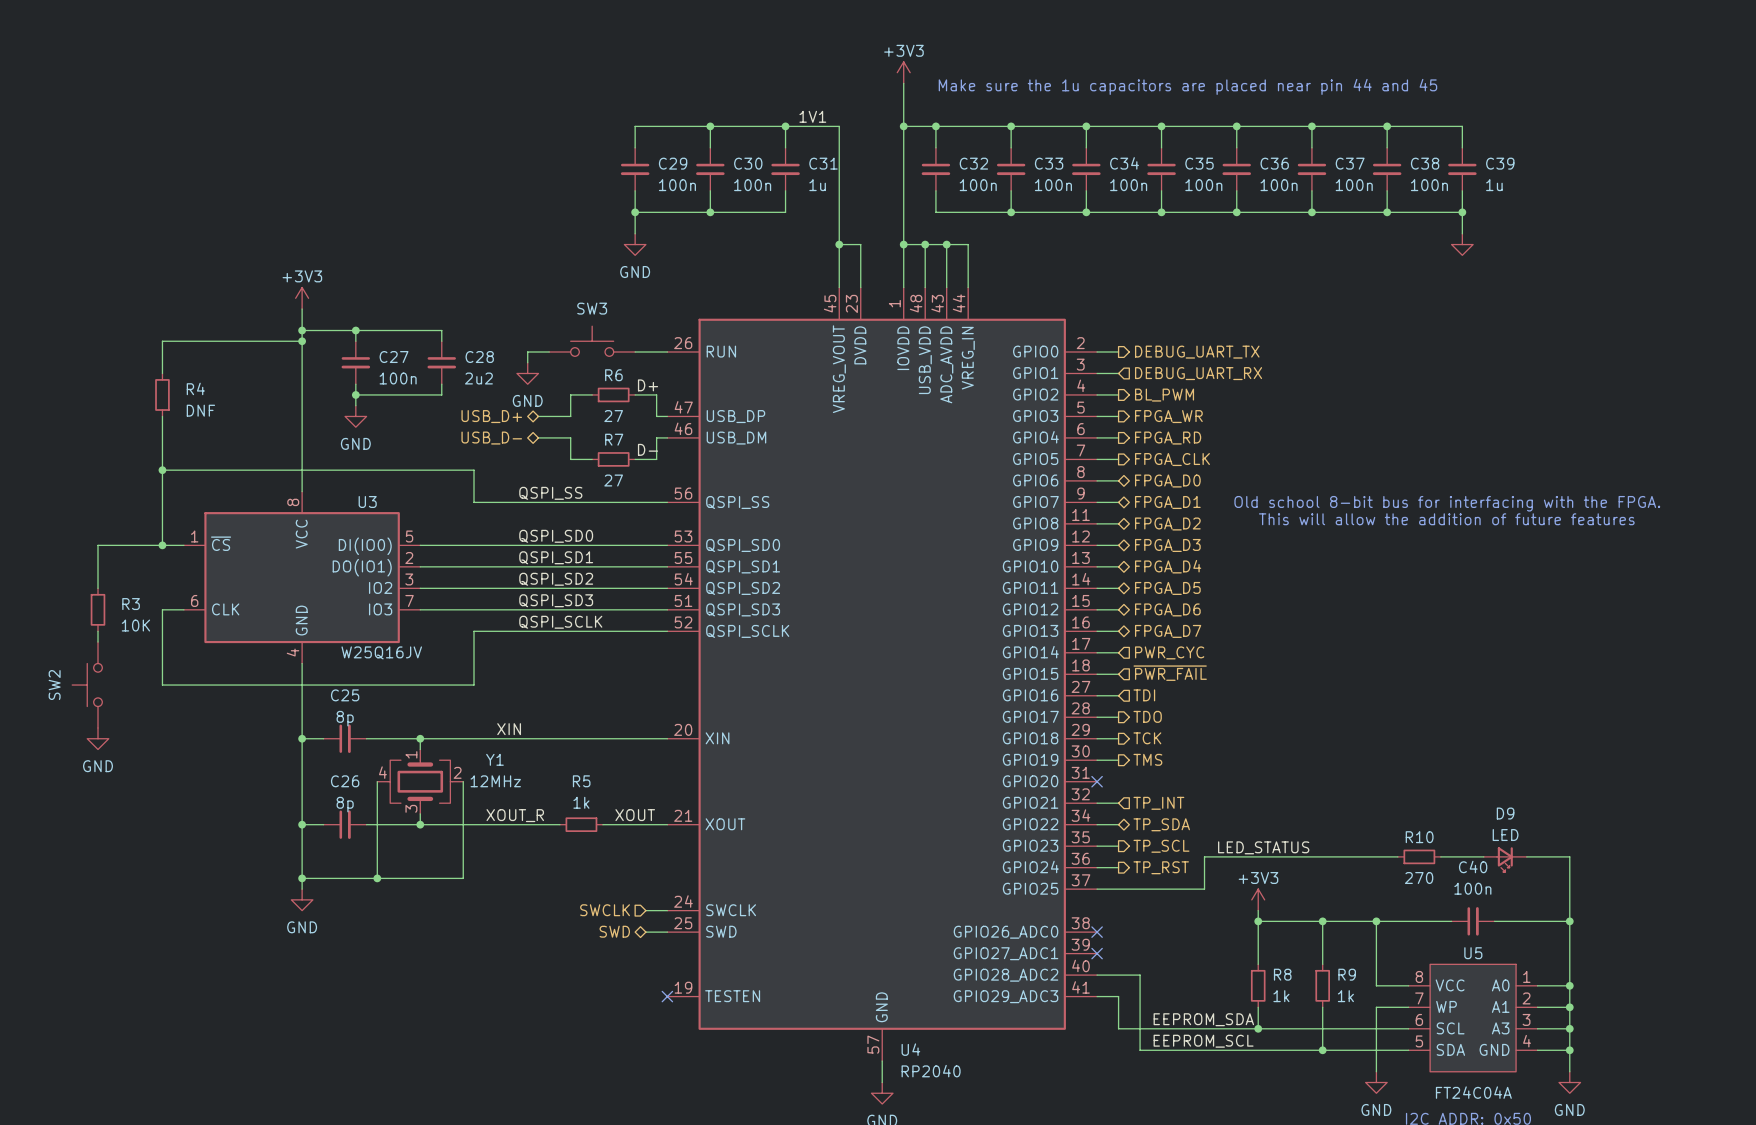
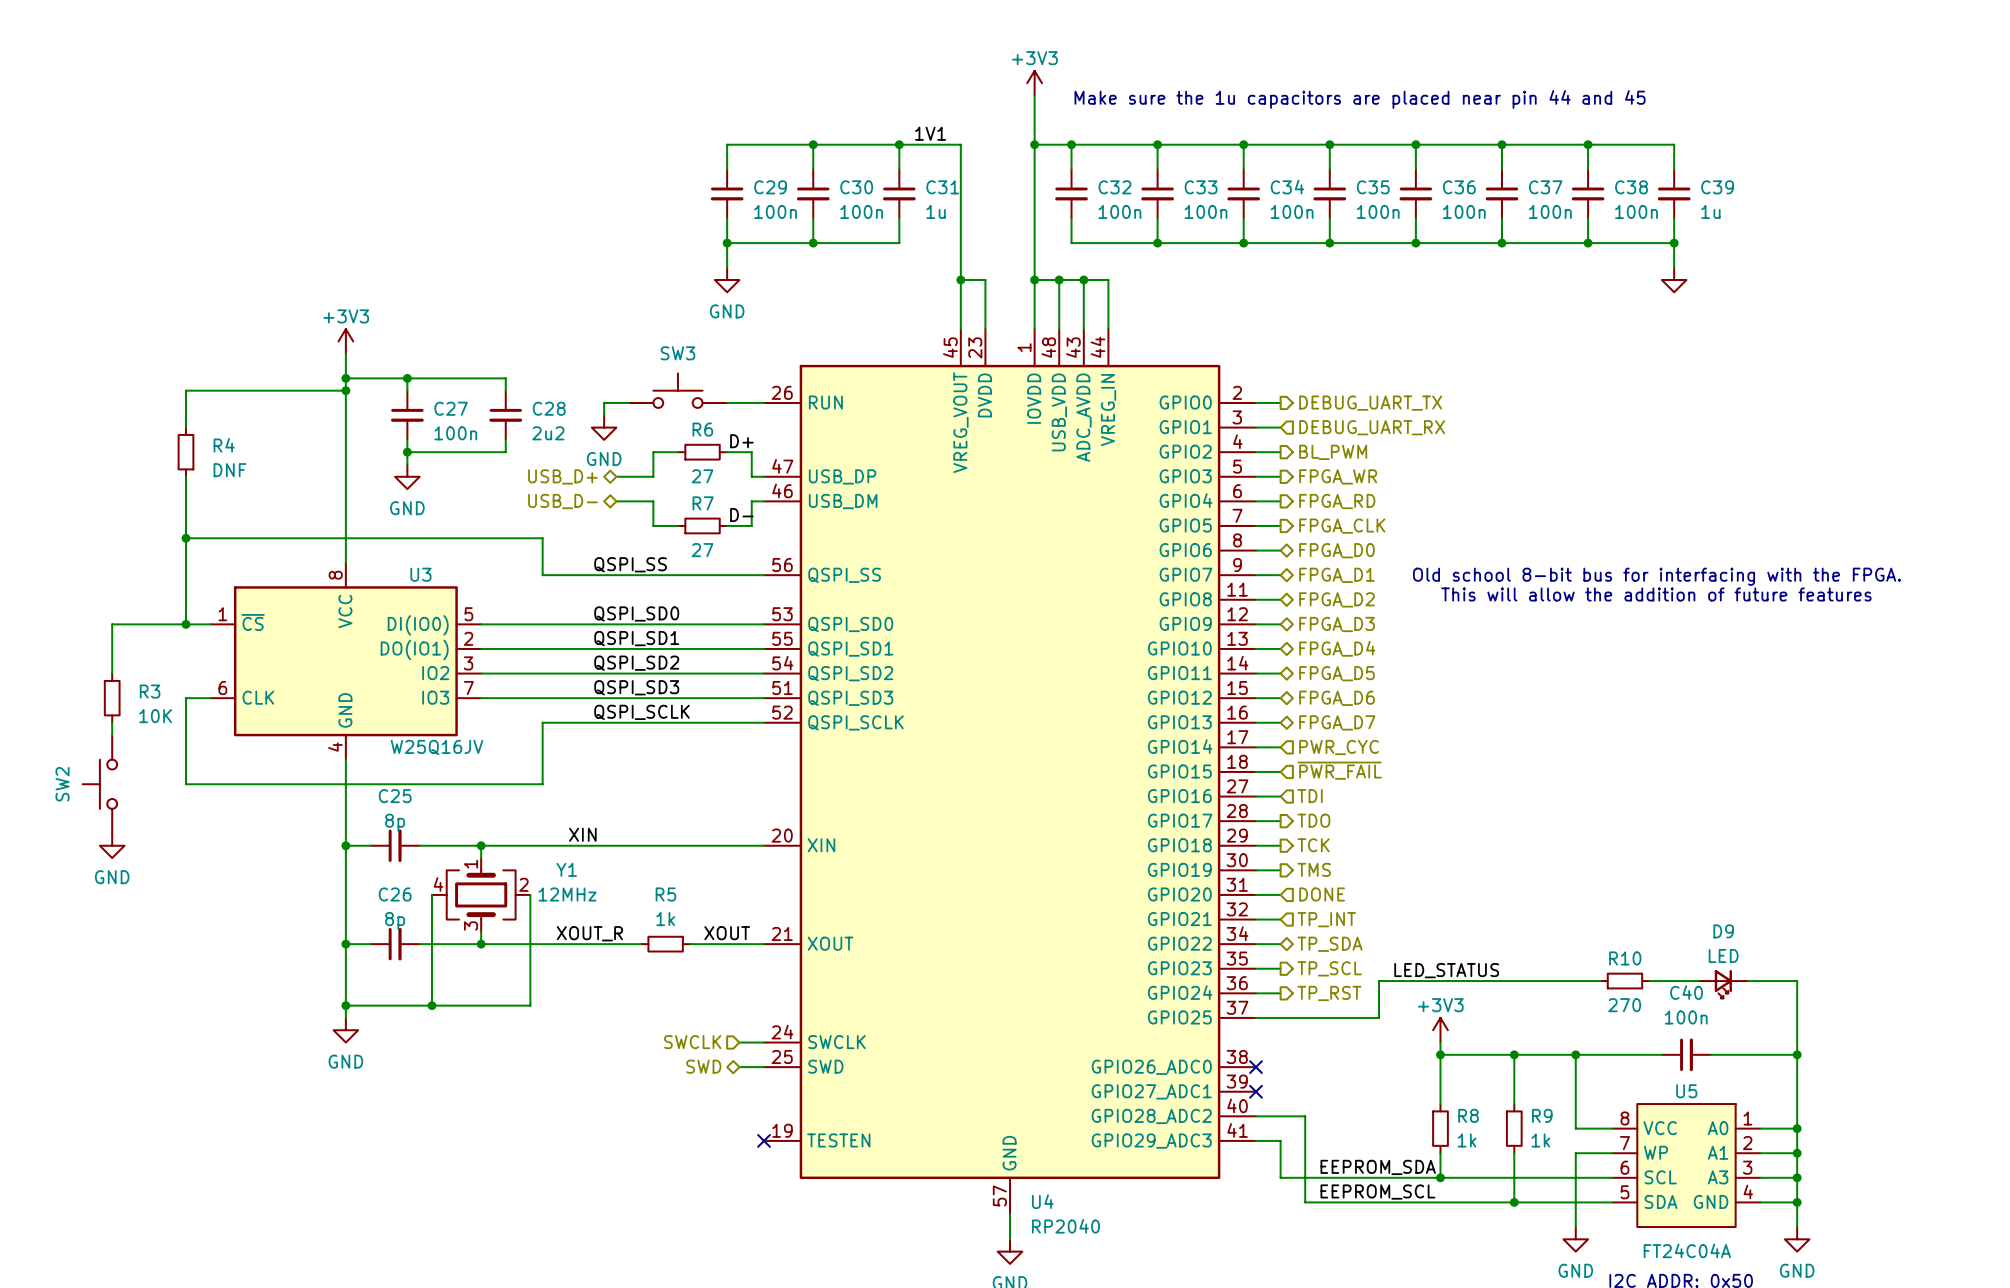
wire: none -> (1256, 894) (1280, 894)
no-connect mark: (1097, 781) -> none
hierarchical label: none -> DONE (1322, 894)

